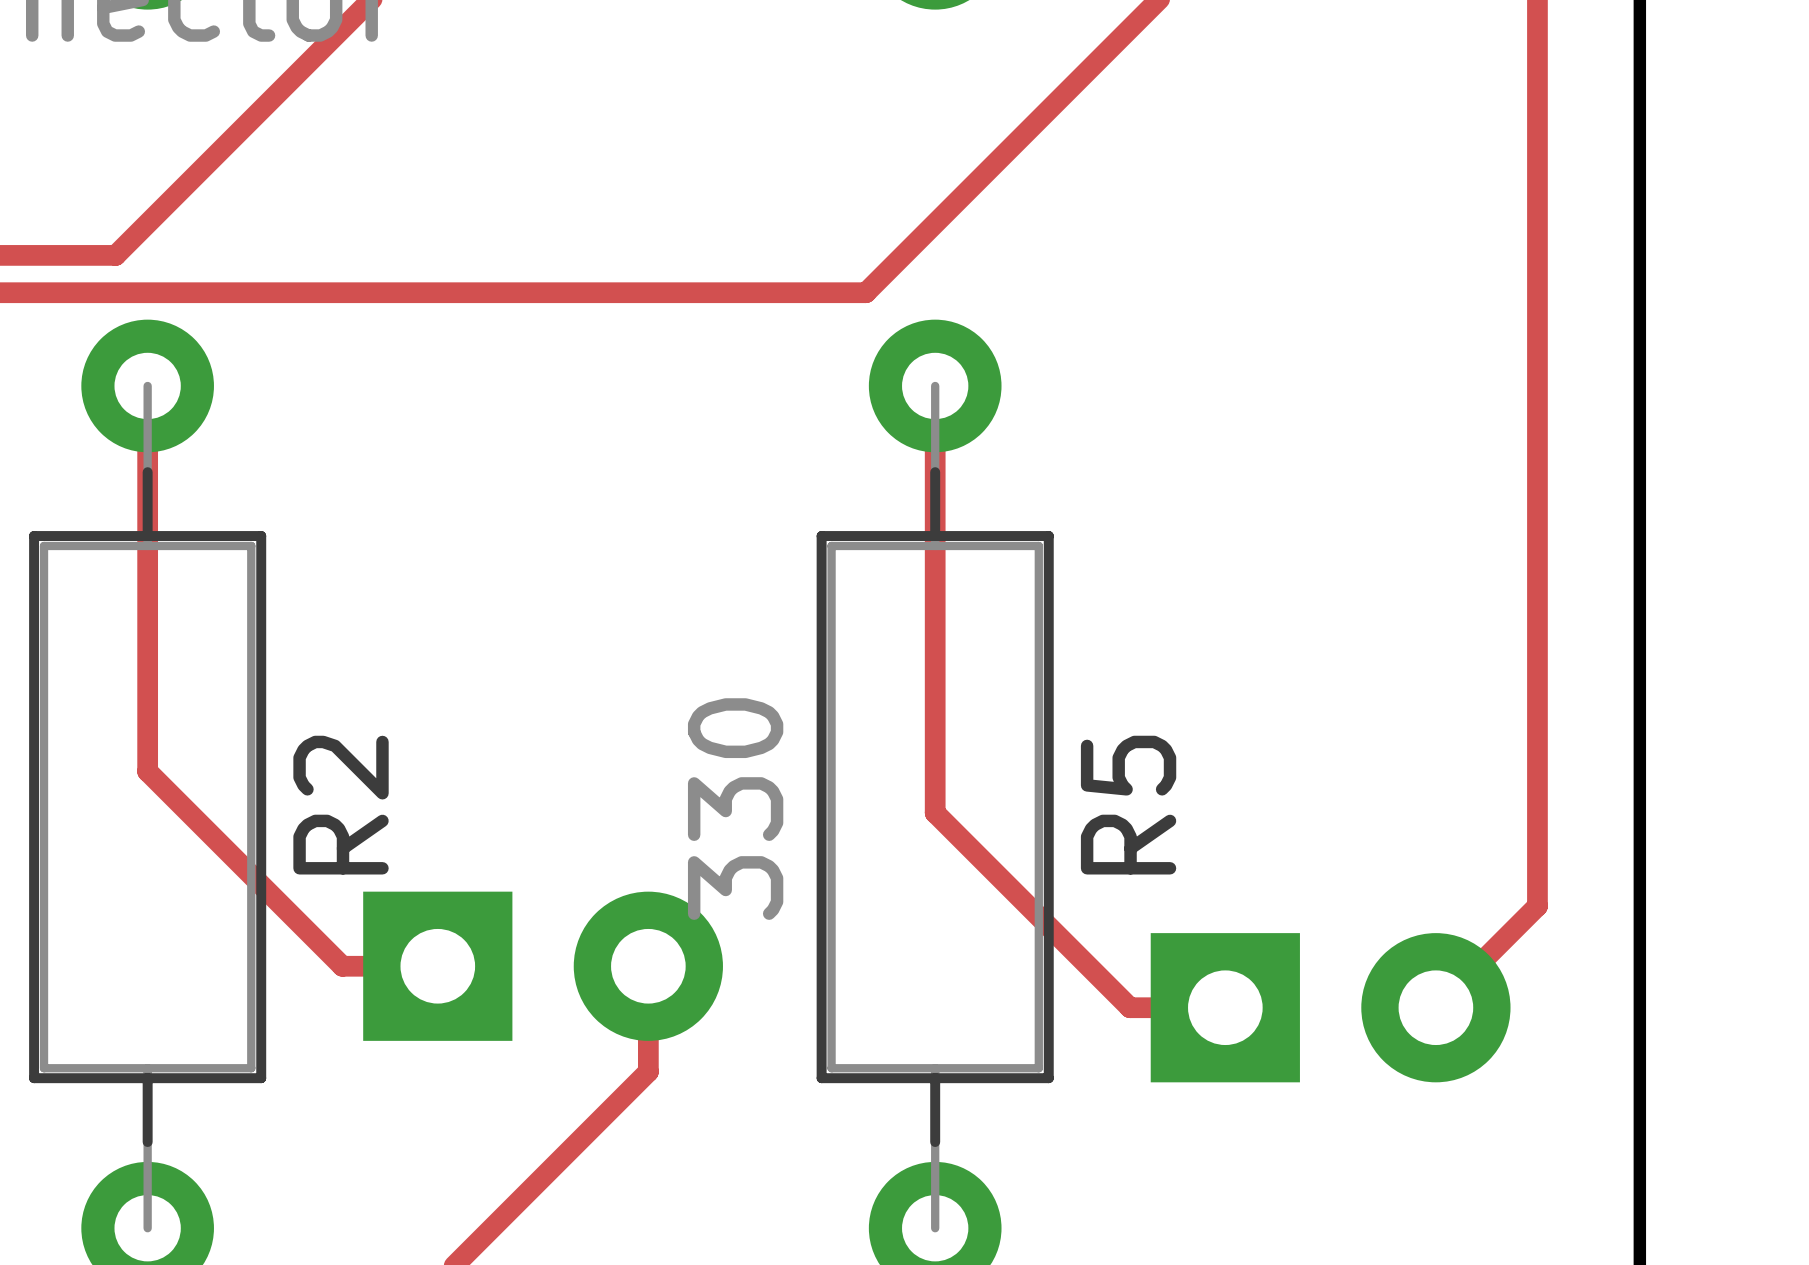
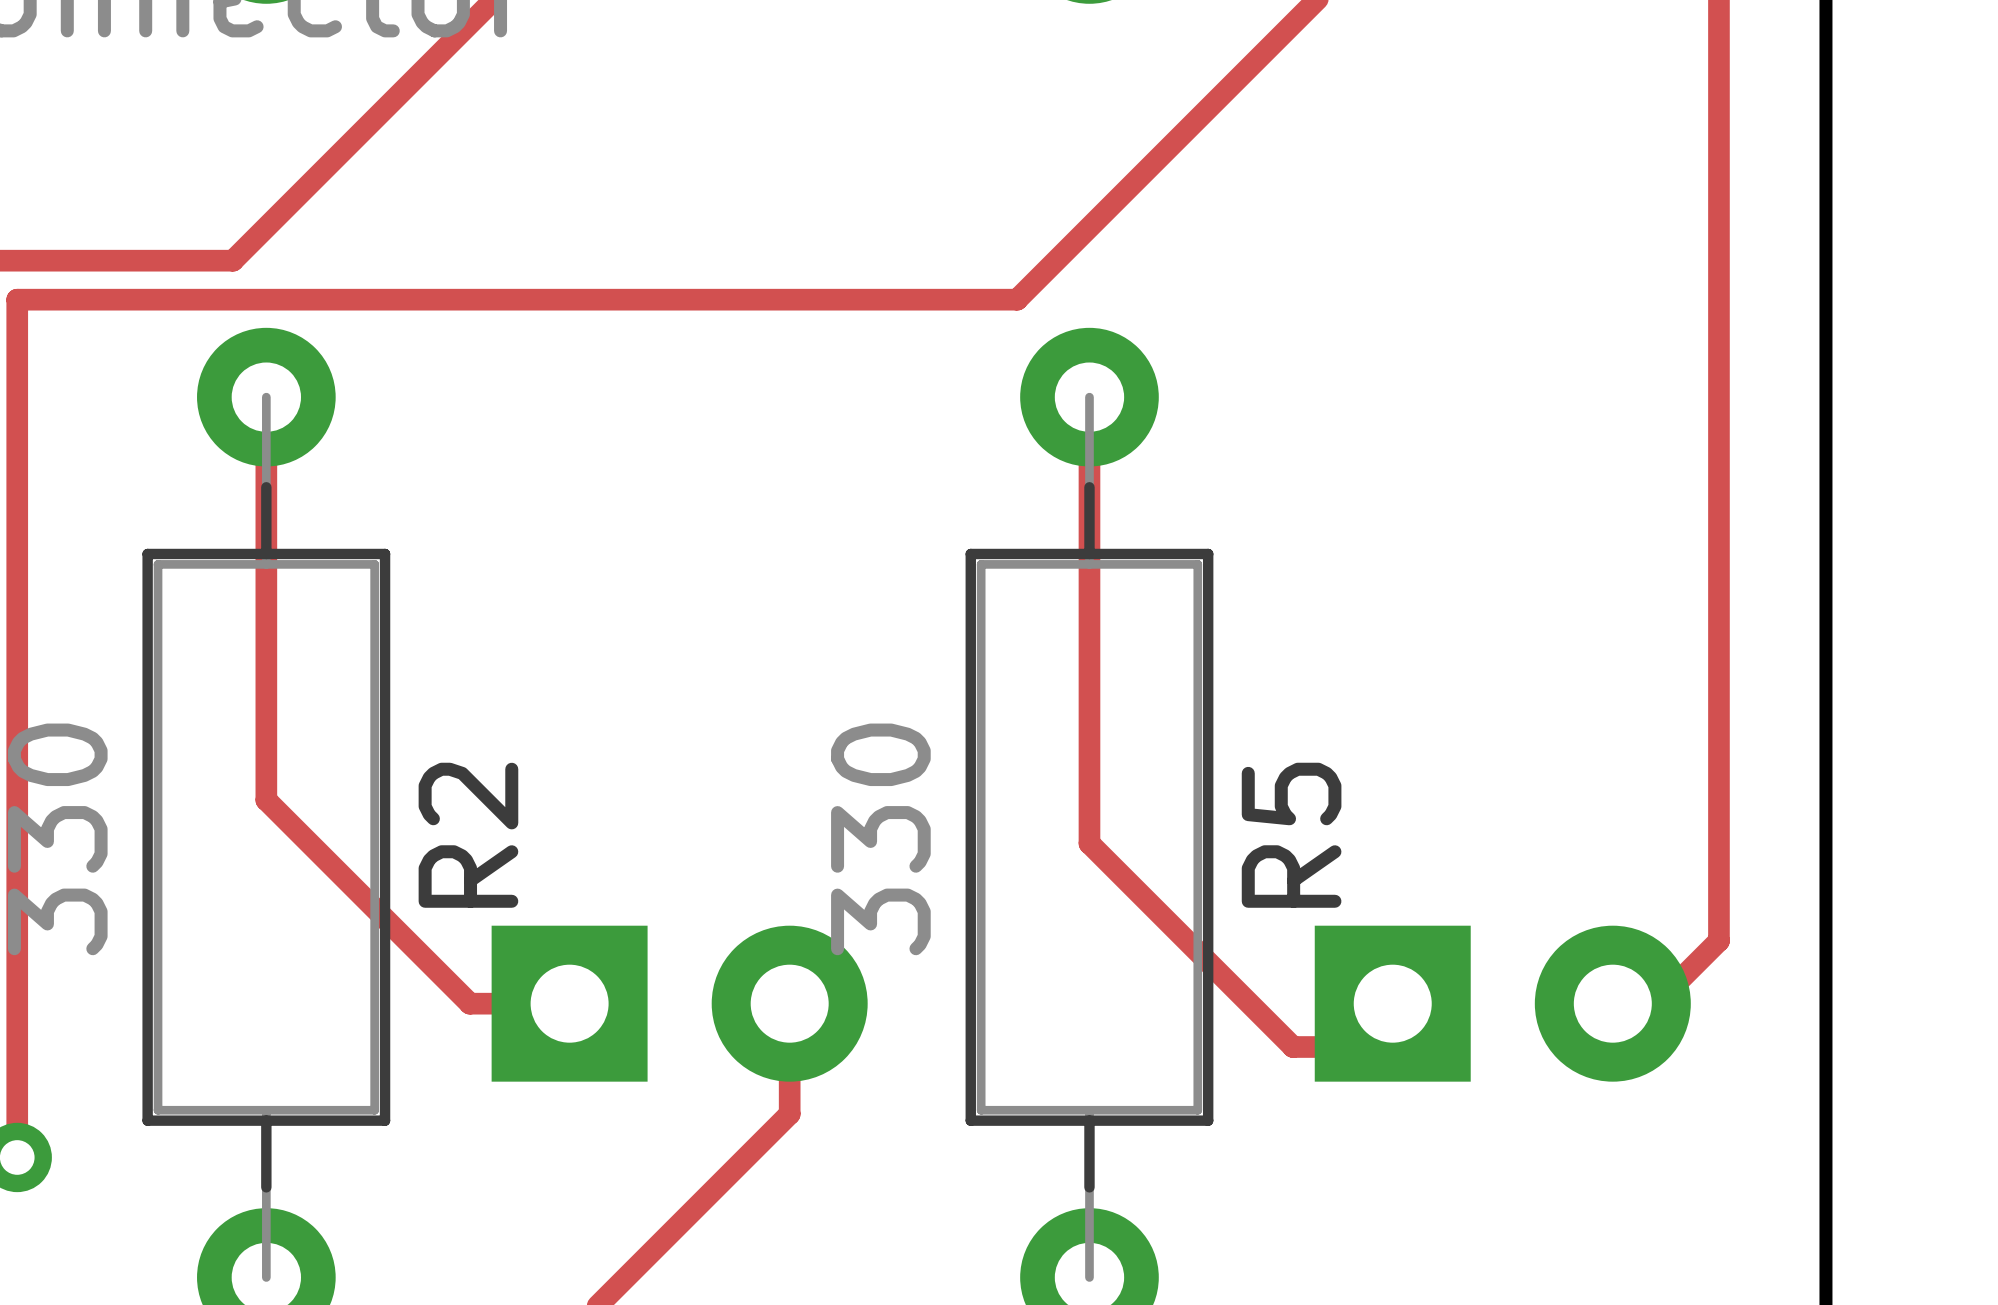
part position: (1330, 1007) -> (1502, 1003)

